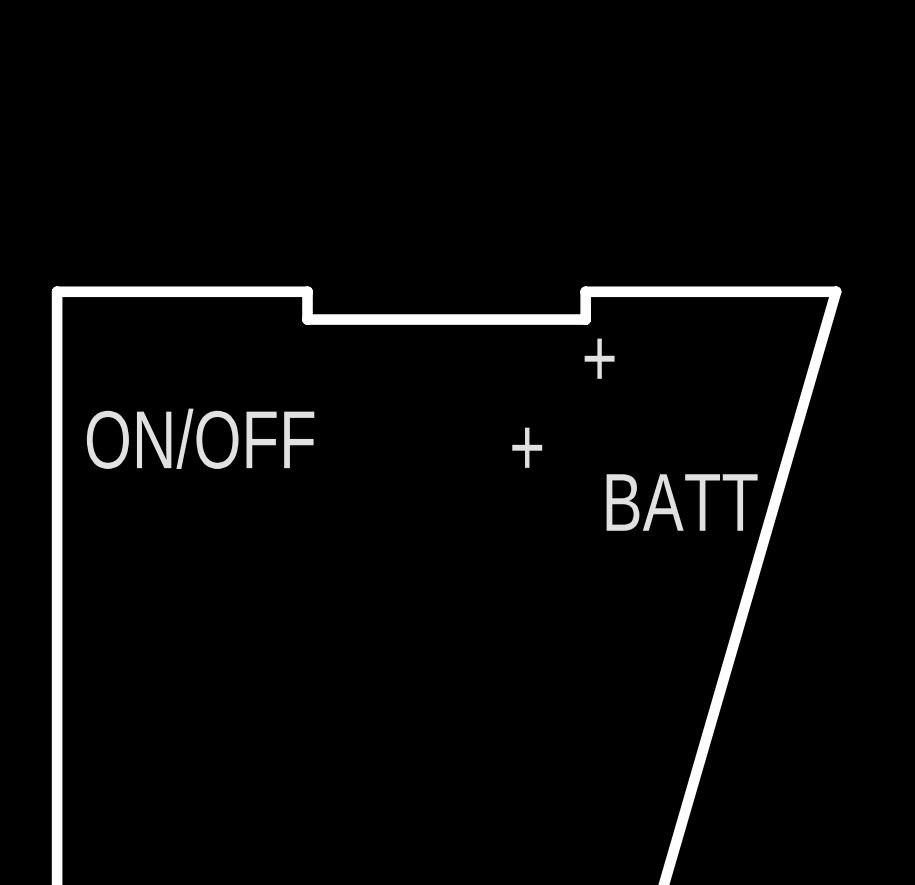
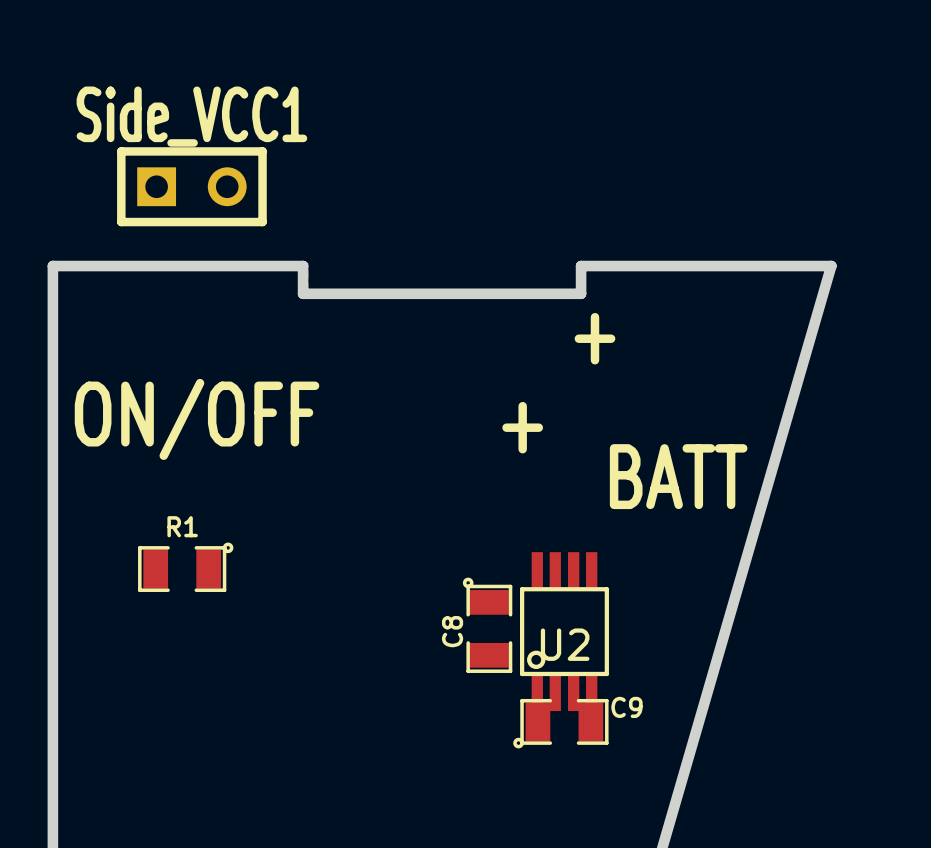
Side_VCC1: none -> (191, 186)
R1: none -> (185, 567)
C8: none -> (487, 625)
U2: none -> (564, 631)
C9: none -> (560, 723)

